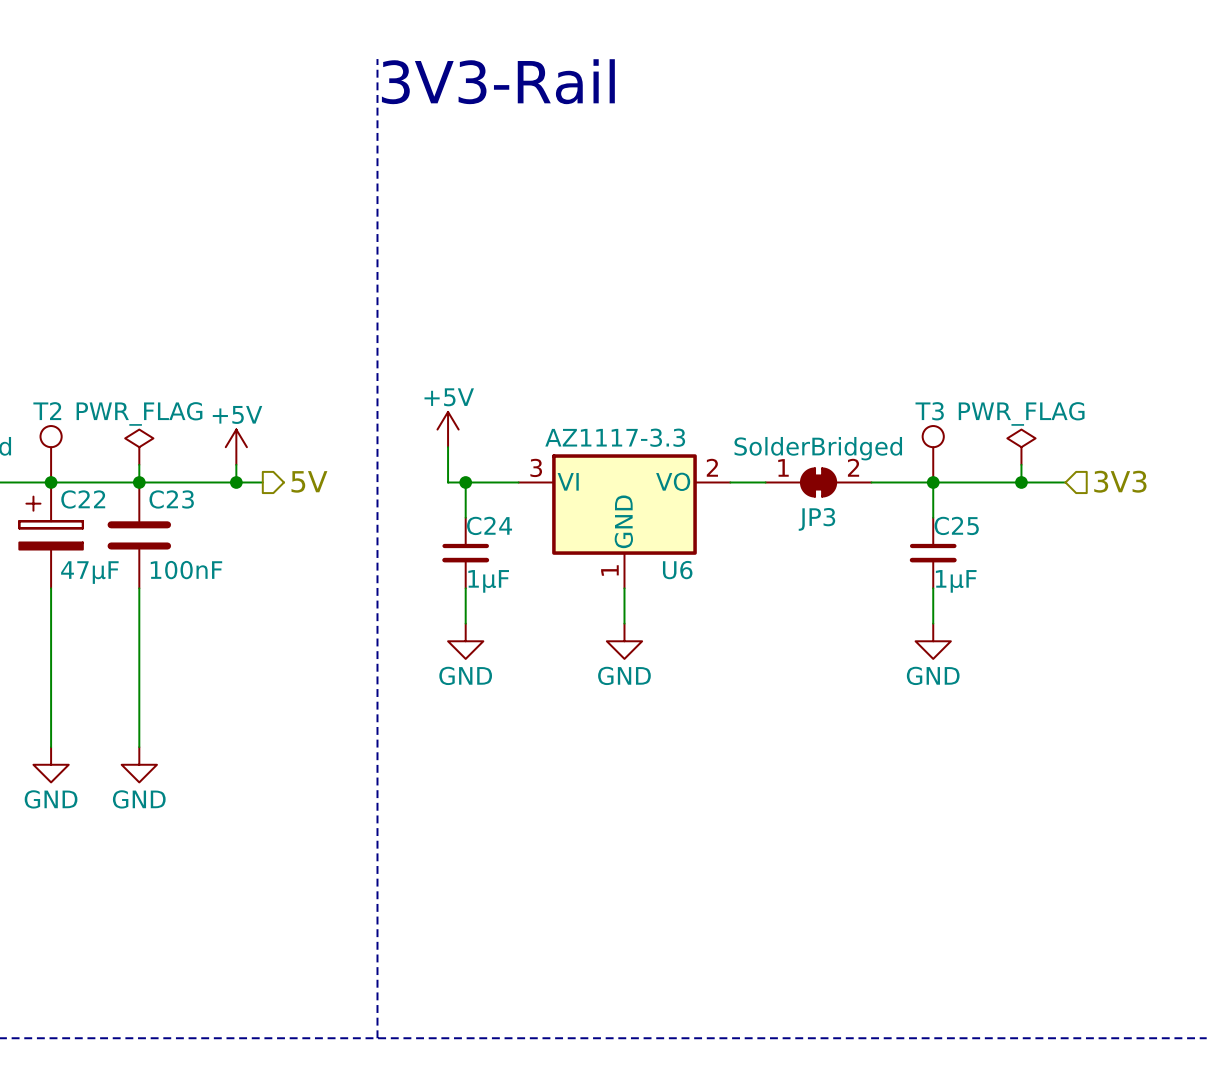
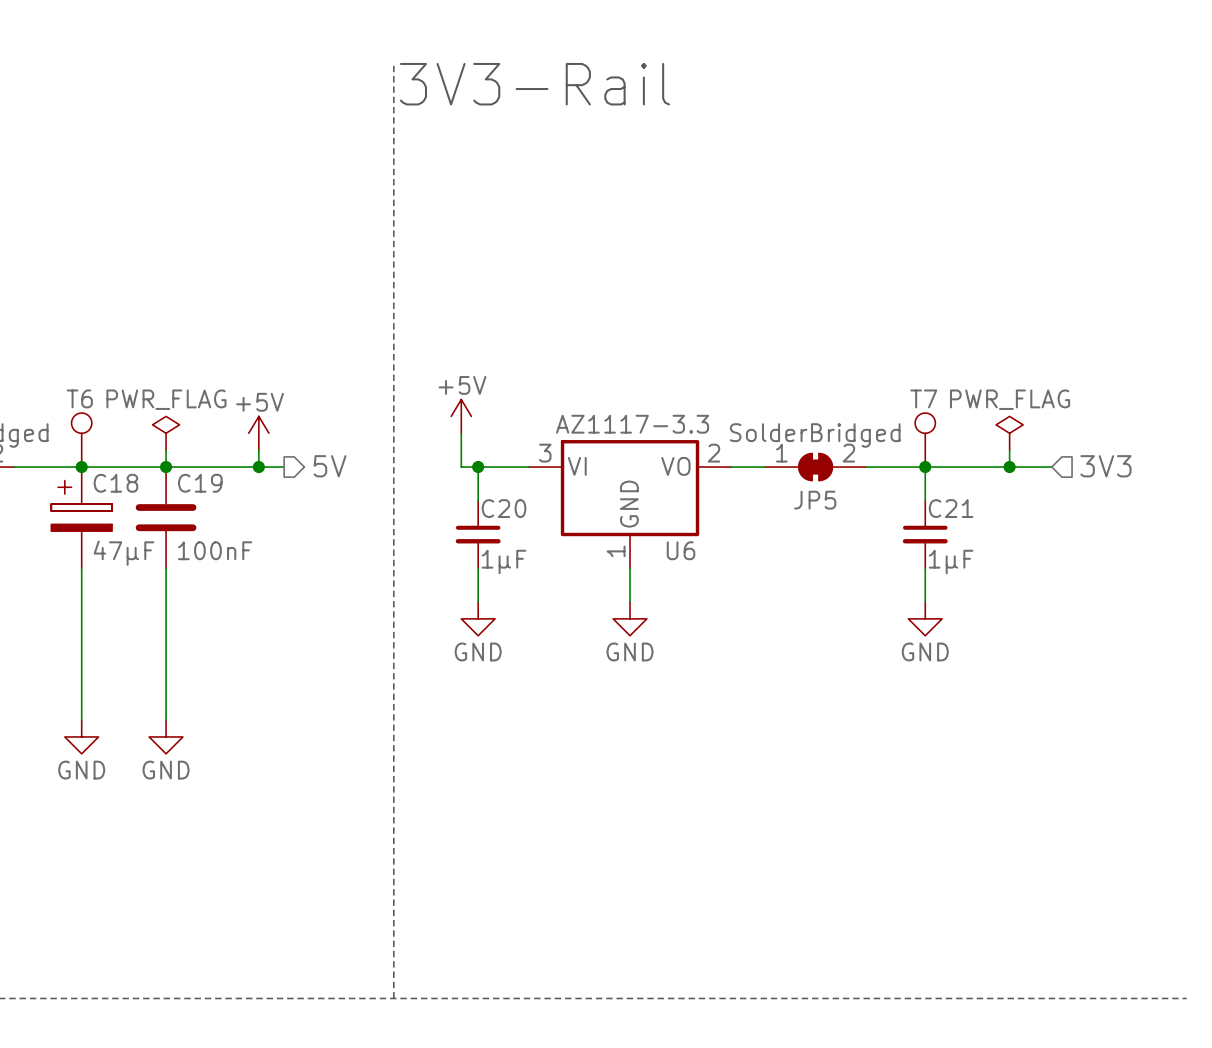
T2 name: T2 (47, 411) -> T6 (79, 398)
T3 name: T3 (929, 411) -> T7 (923, 398)
C22 name: C22 (83, 499) -> C18 (115, 483)
C23 name: C23 (171, 499) -> C19 (200, 483)
JP3 name: JP3 (816, 519) -> JP5 (815, 500)
C24 name: C24 (489, 525) -> C20 (504, 508)
C25 name: C25 (956, 525) -> C21 (951, 508)

